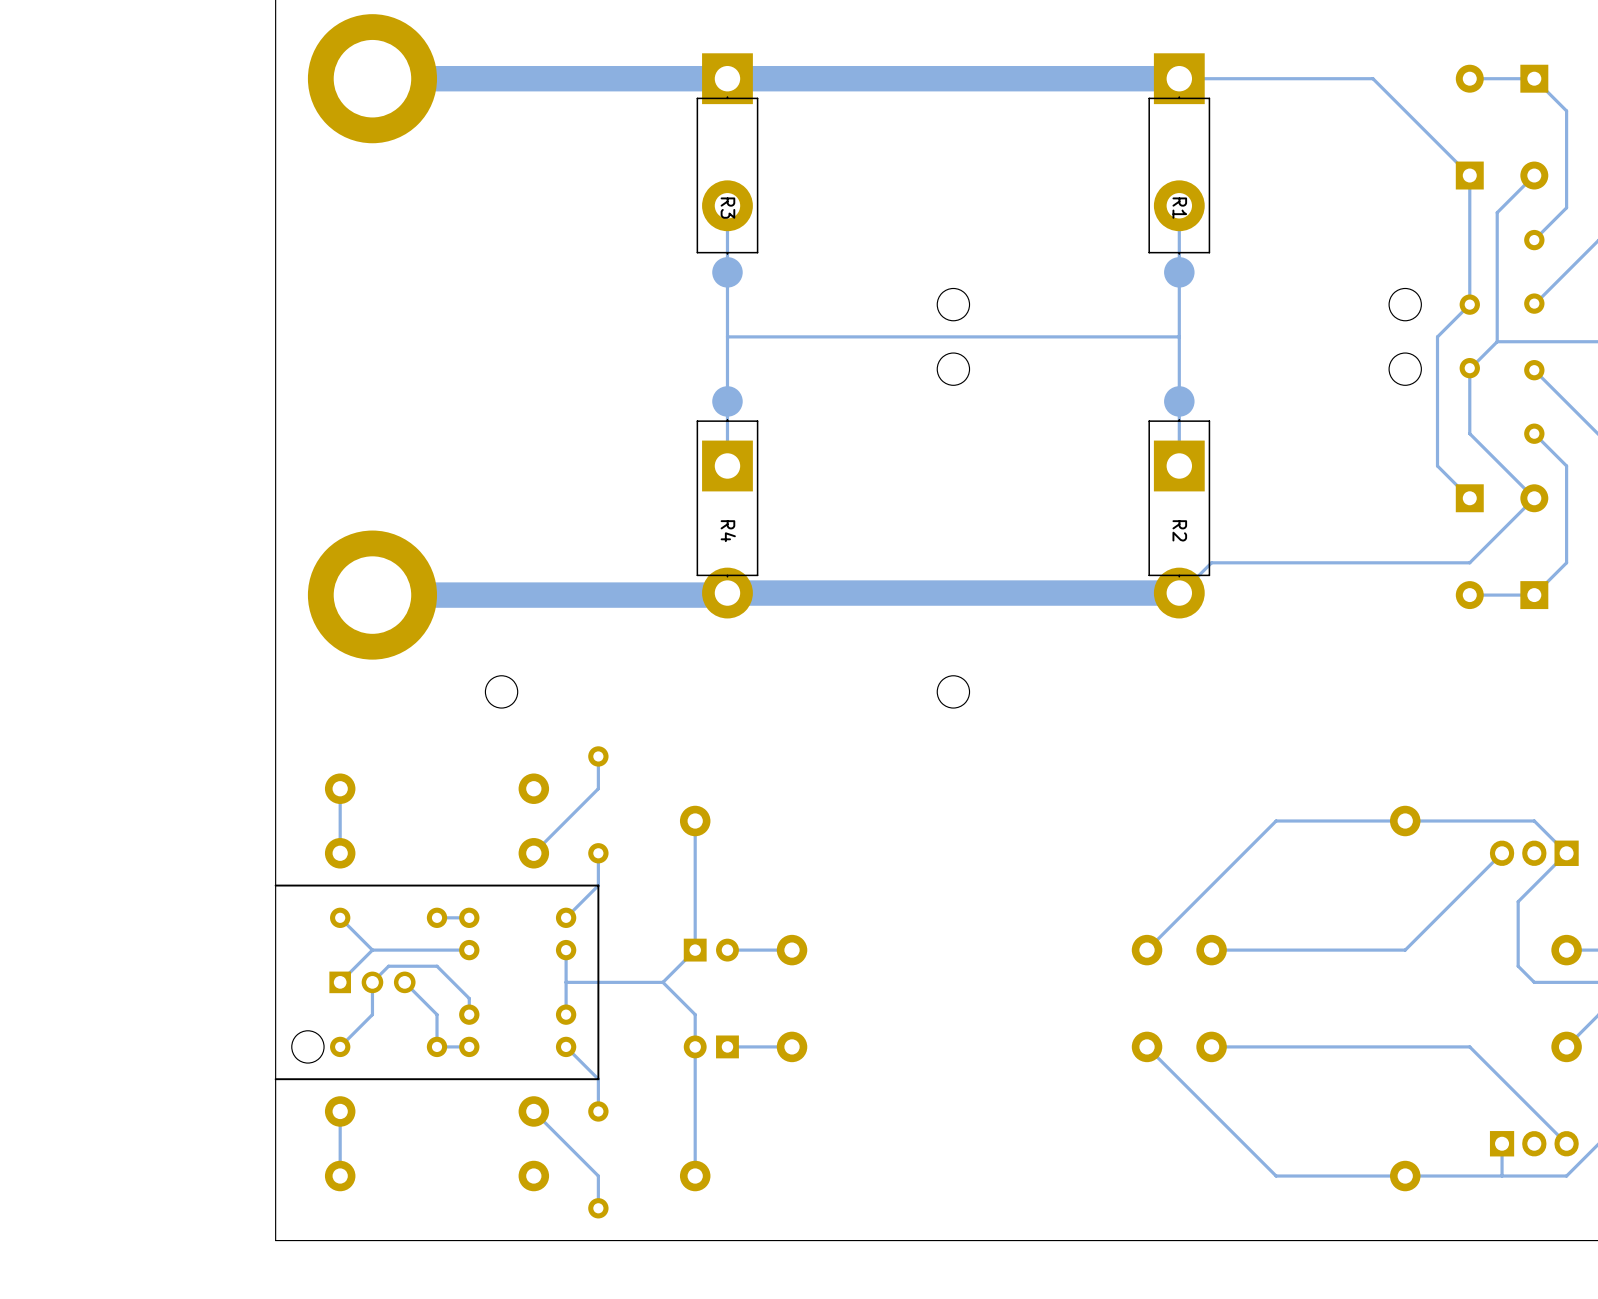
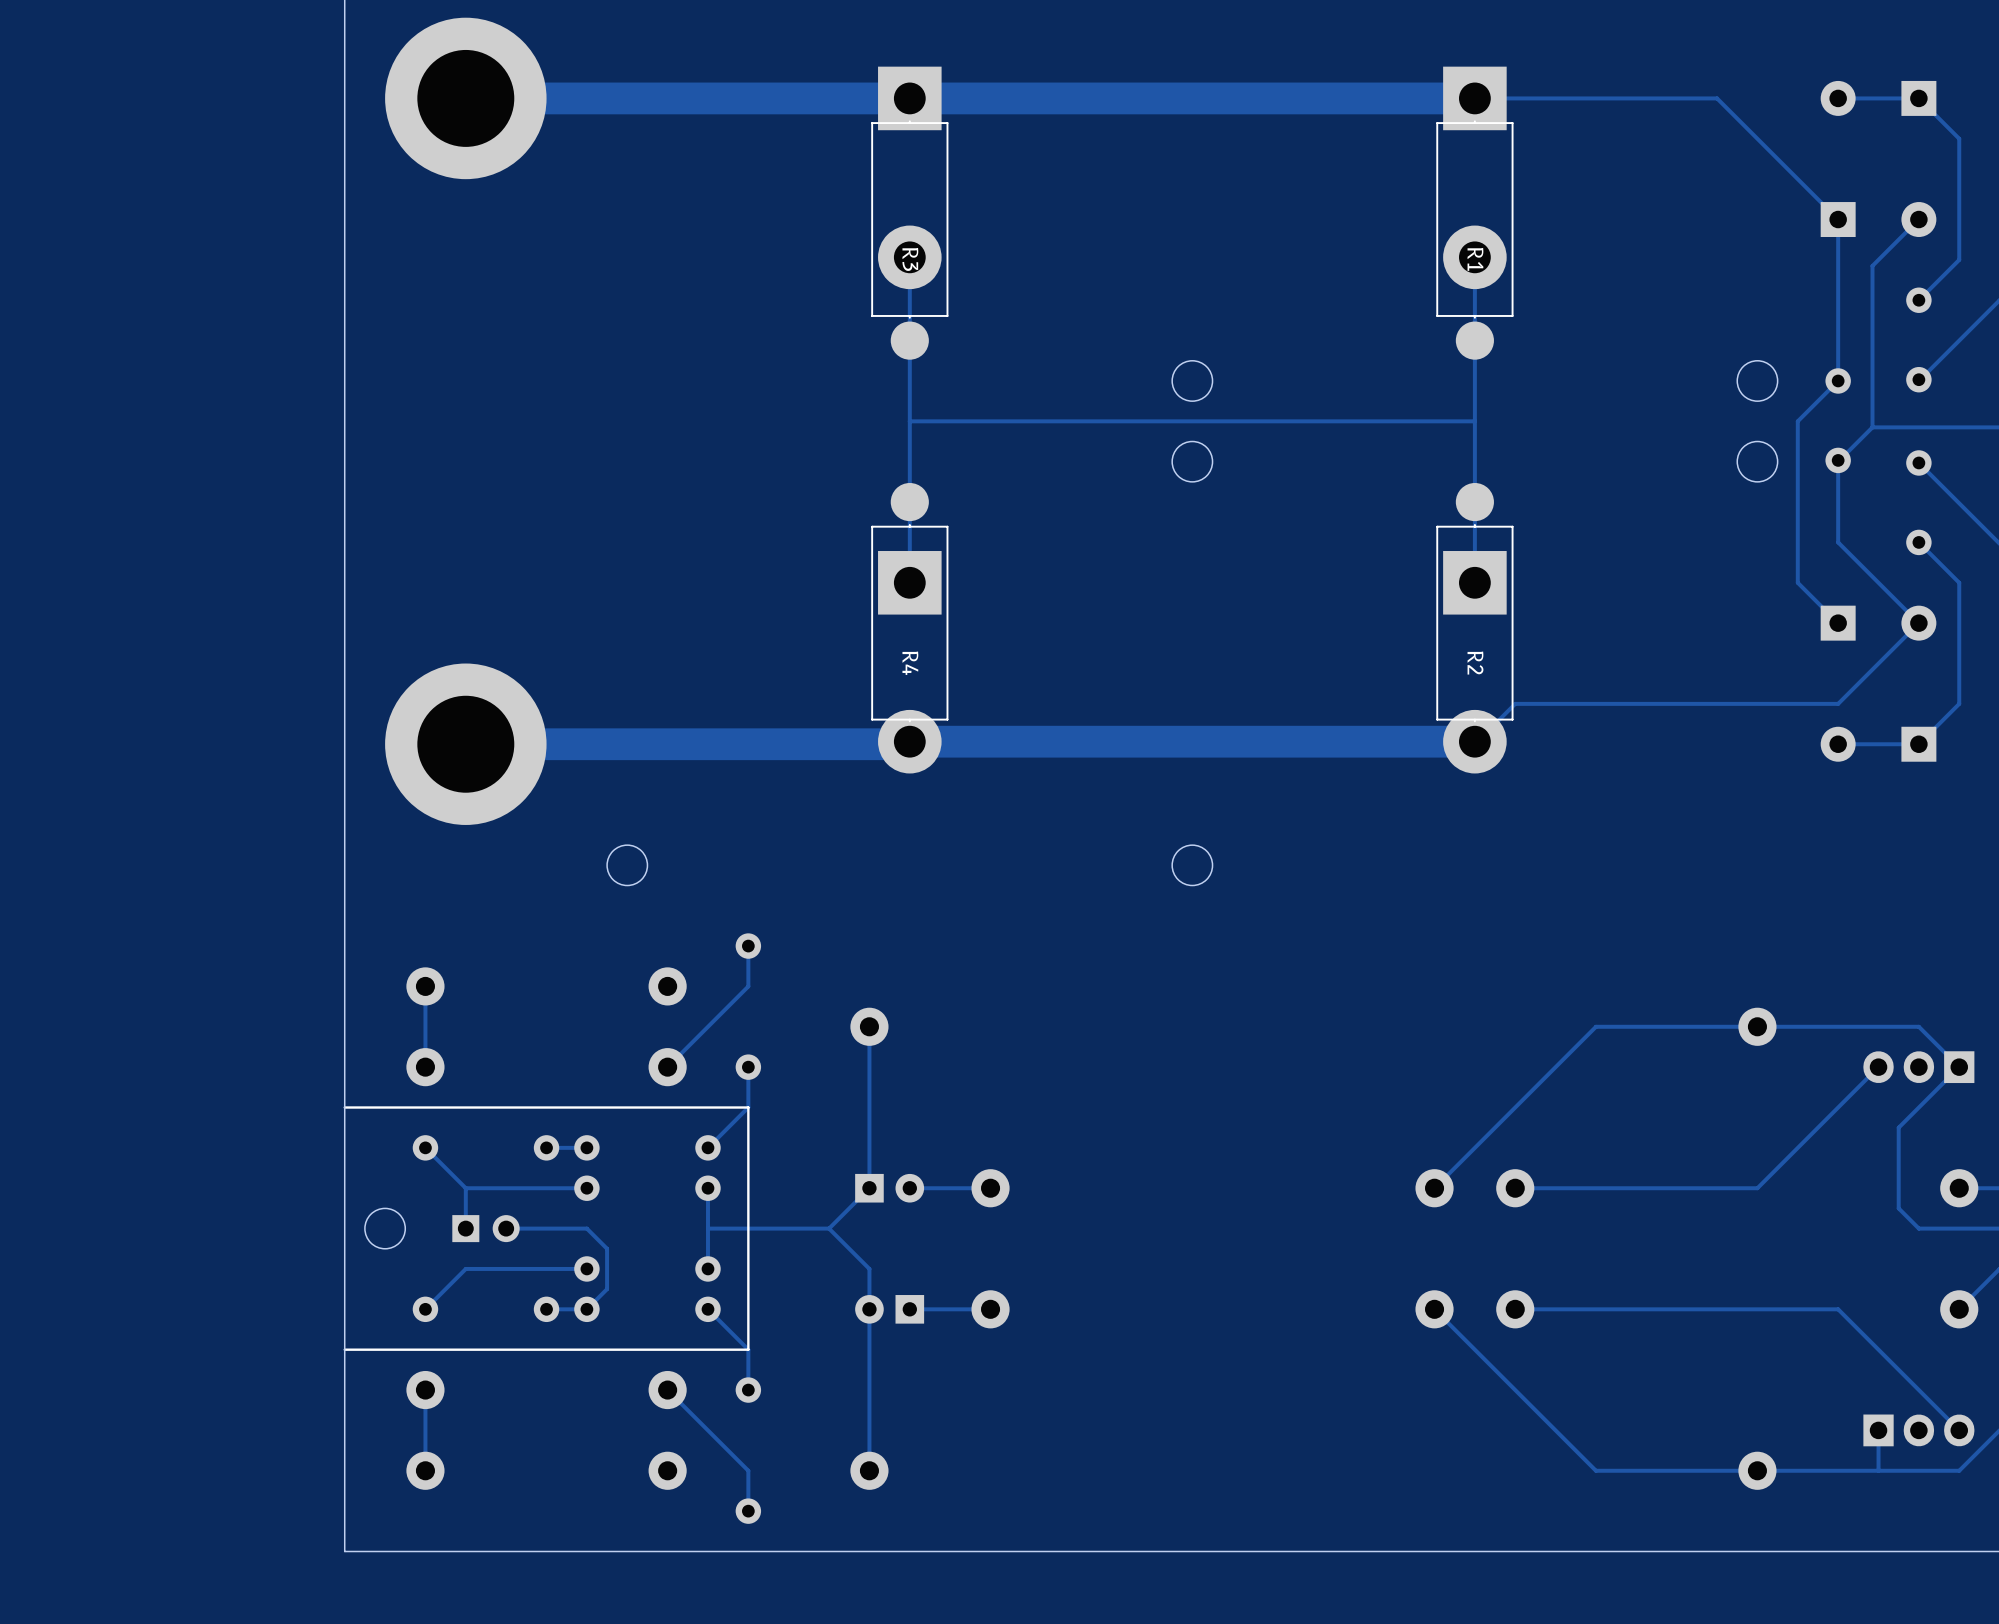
track: (372, 950) (340, 982) -> (465, 1188) (465, 1228)
part: (372, 982) -> none
part: none -> (486, 1228)
track: (404, 982) (437, 1014) (437, 1046) -> (506, 1228) (586, 1228) (607, 1248) (607, 1289) (586, 1309)
track: (469, 1014) (469, 998) (437, 966) (388, 966) (372, 982) (372, 1014) -> (586, 1268) (465, 1268)
round board edge position: (307, 1046) -> (385, 1228)

